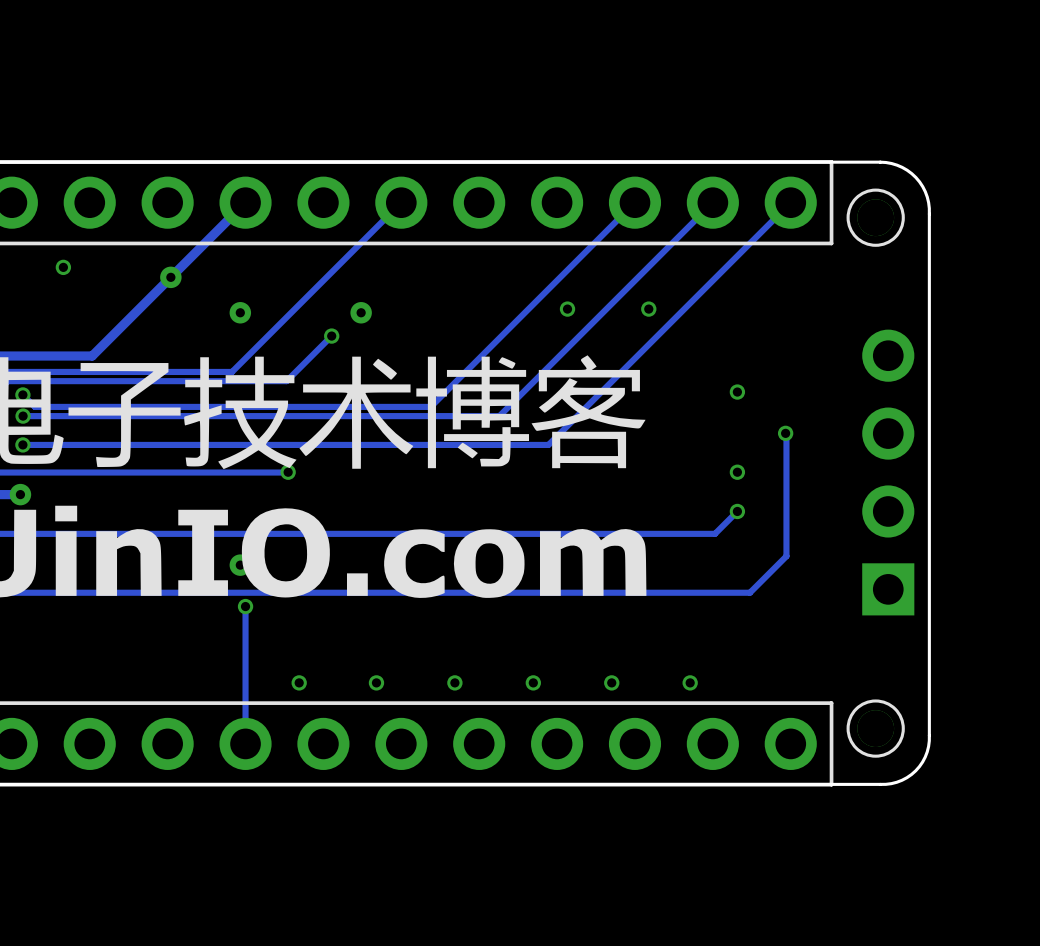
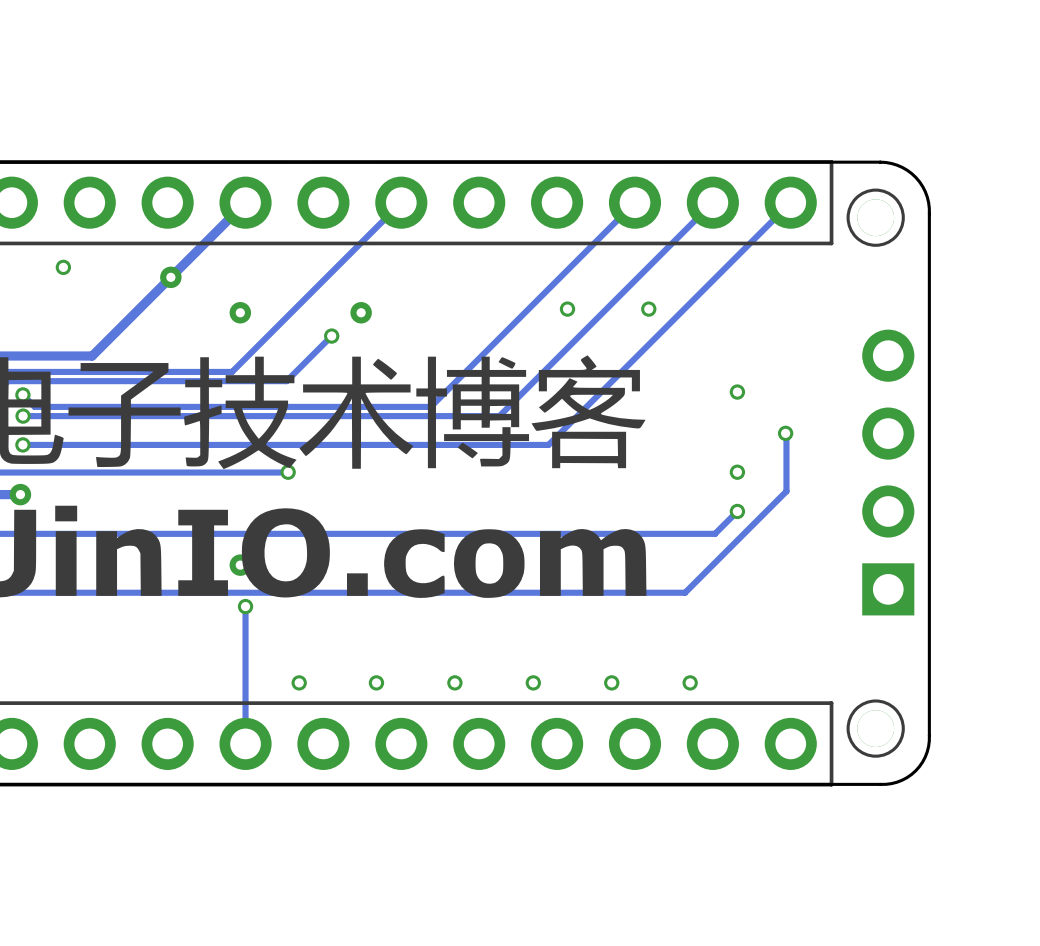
track: (786, 491) (786, 556) (749, 592) (685, 592) -> (786, 491) (685, 592)

